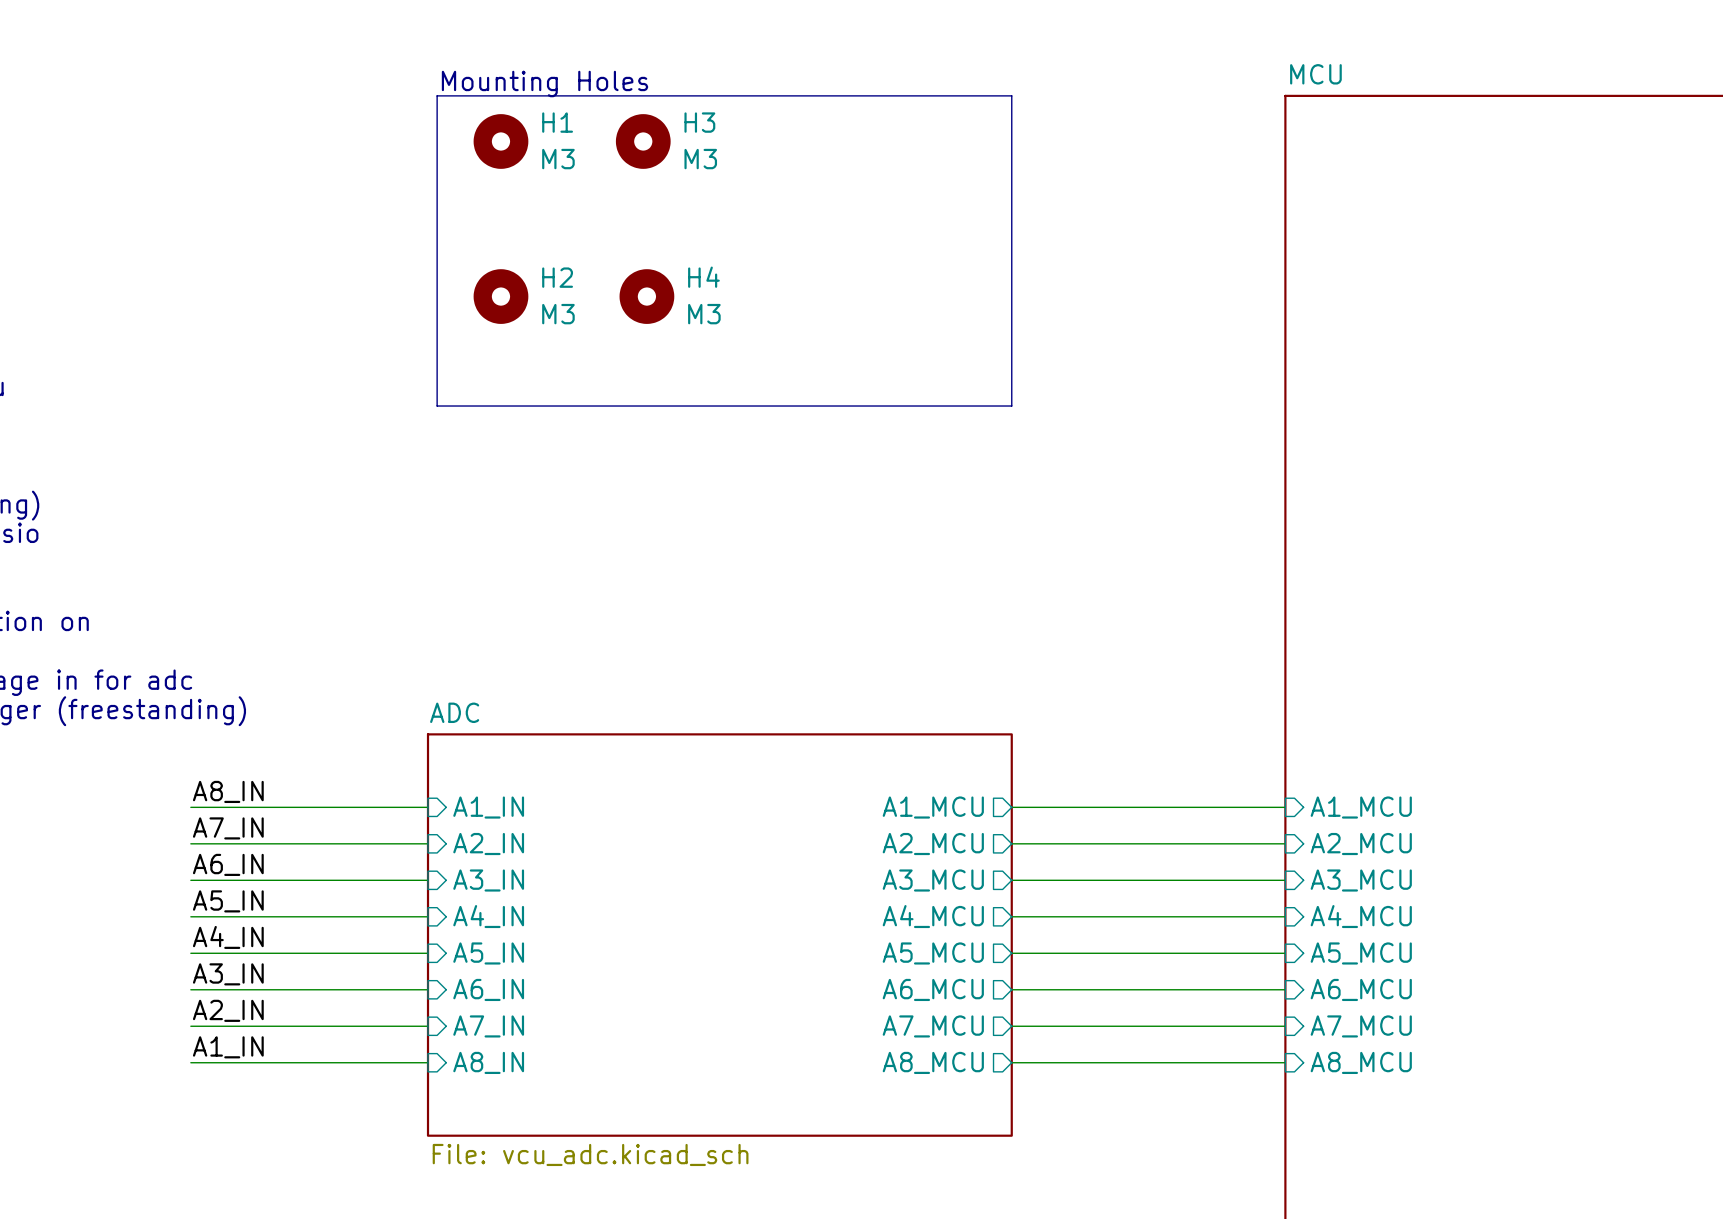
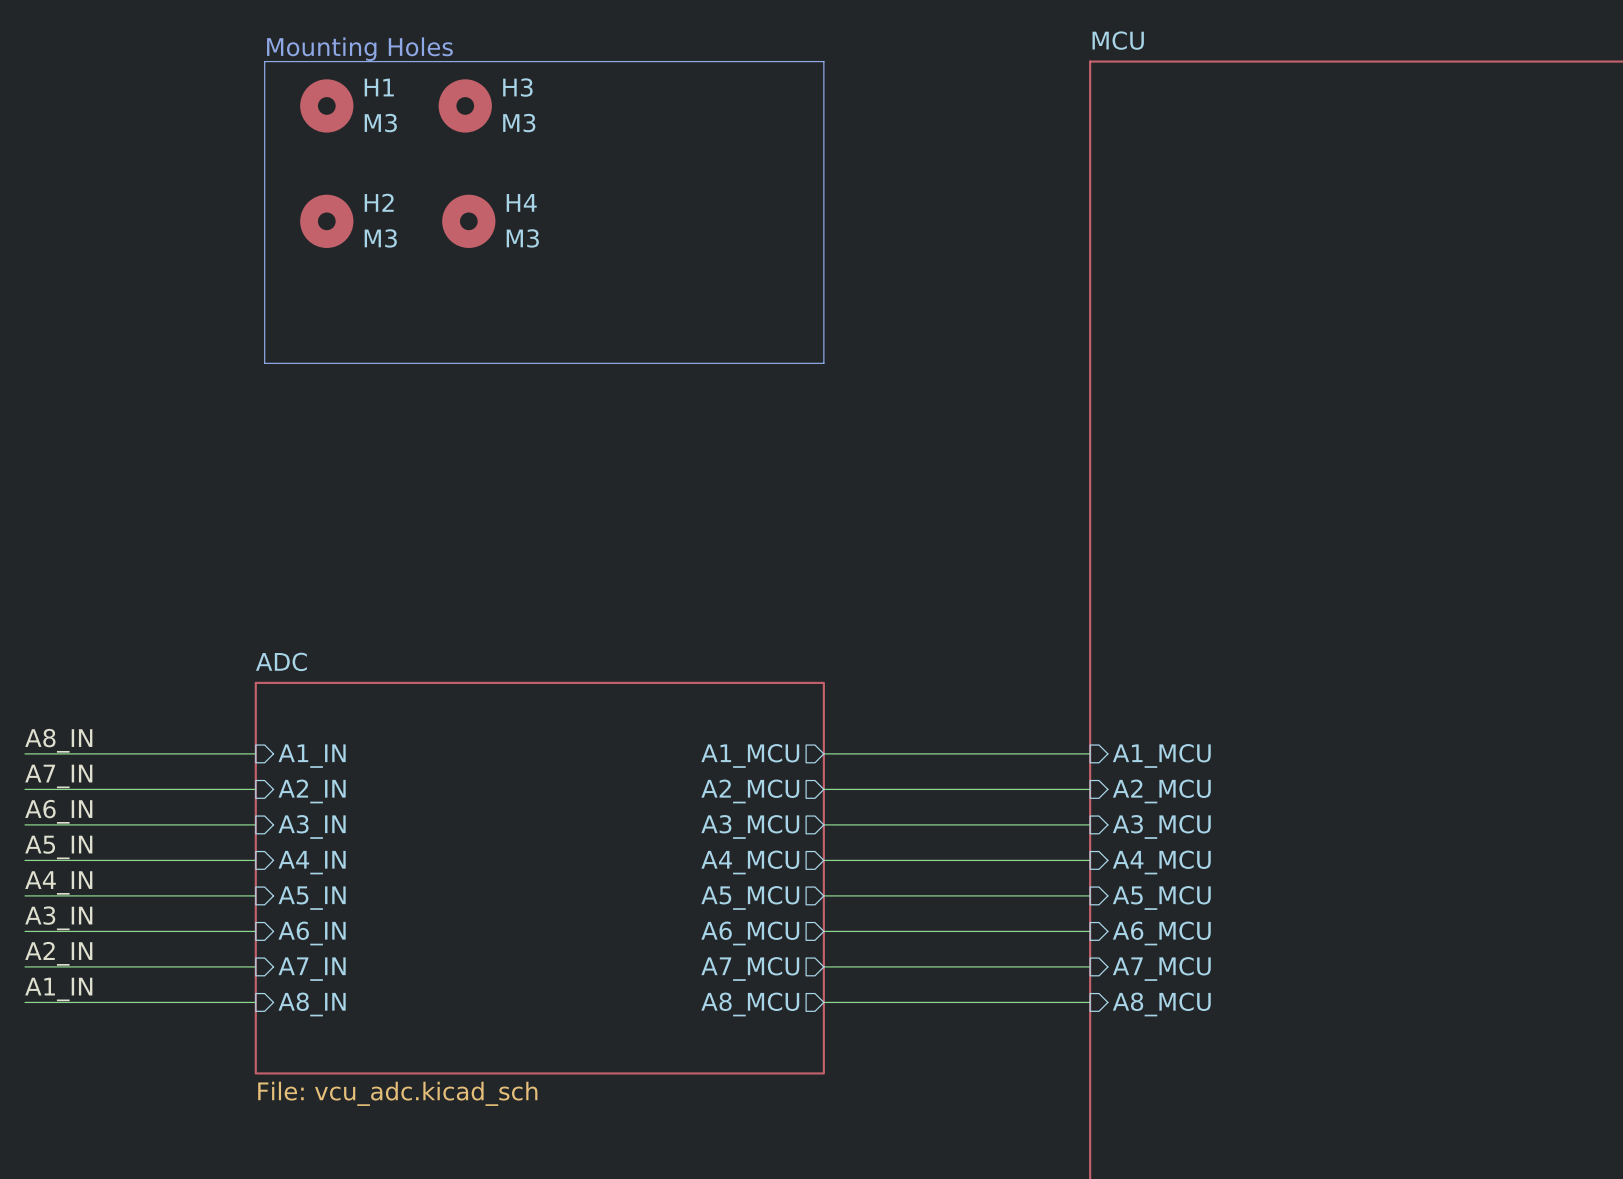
H2 position: (500, 296) -> (326, 221)
H4 position: (646, 296) -> (468, 221)

